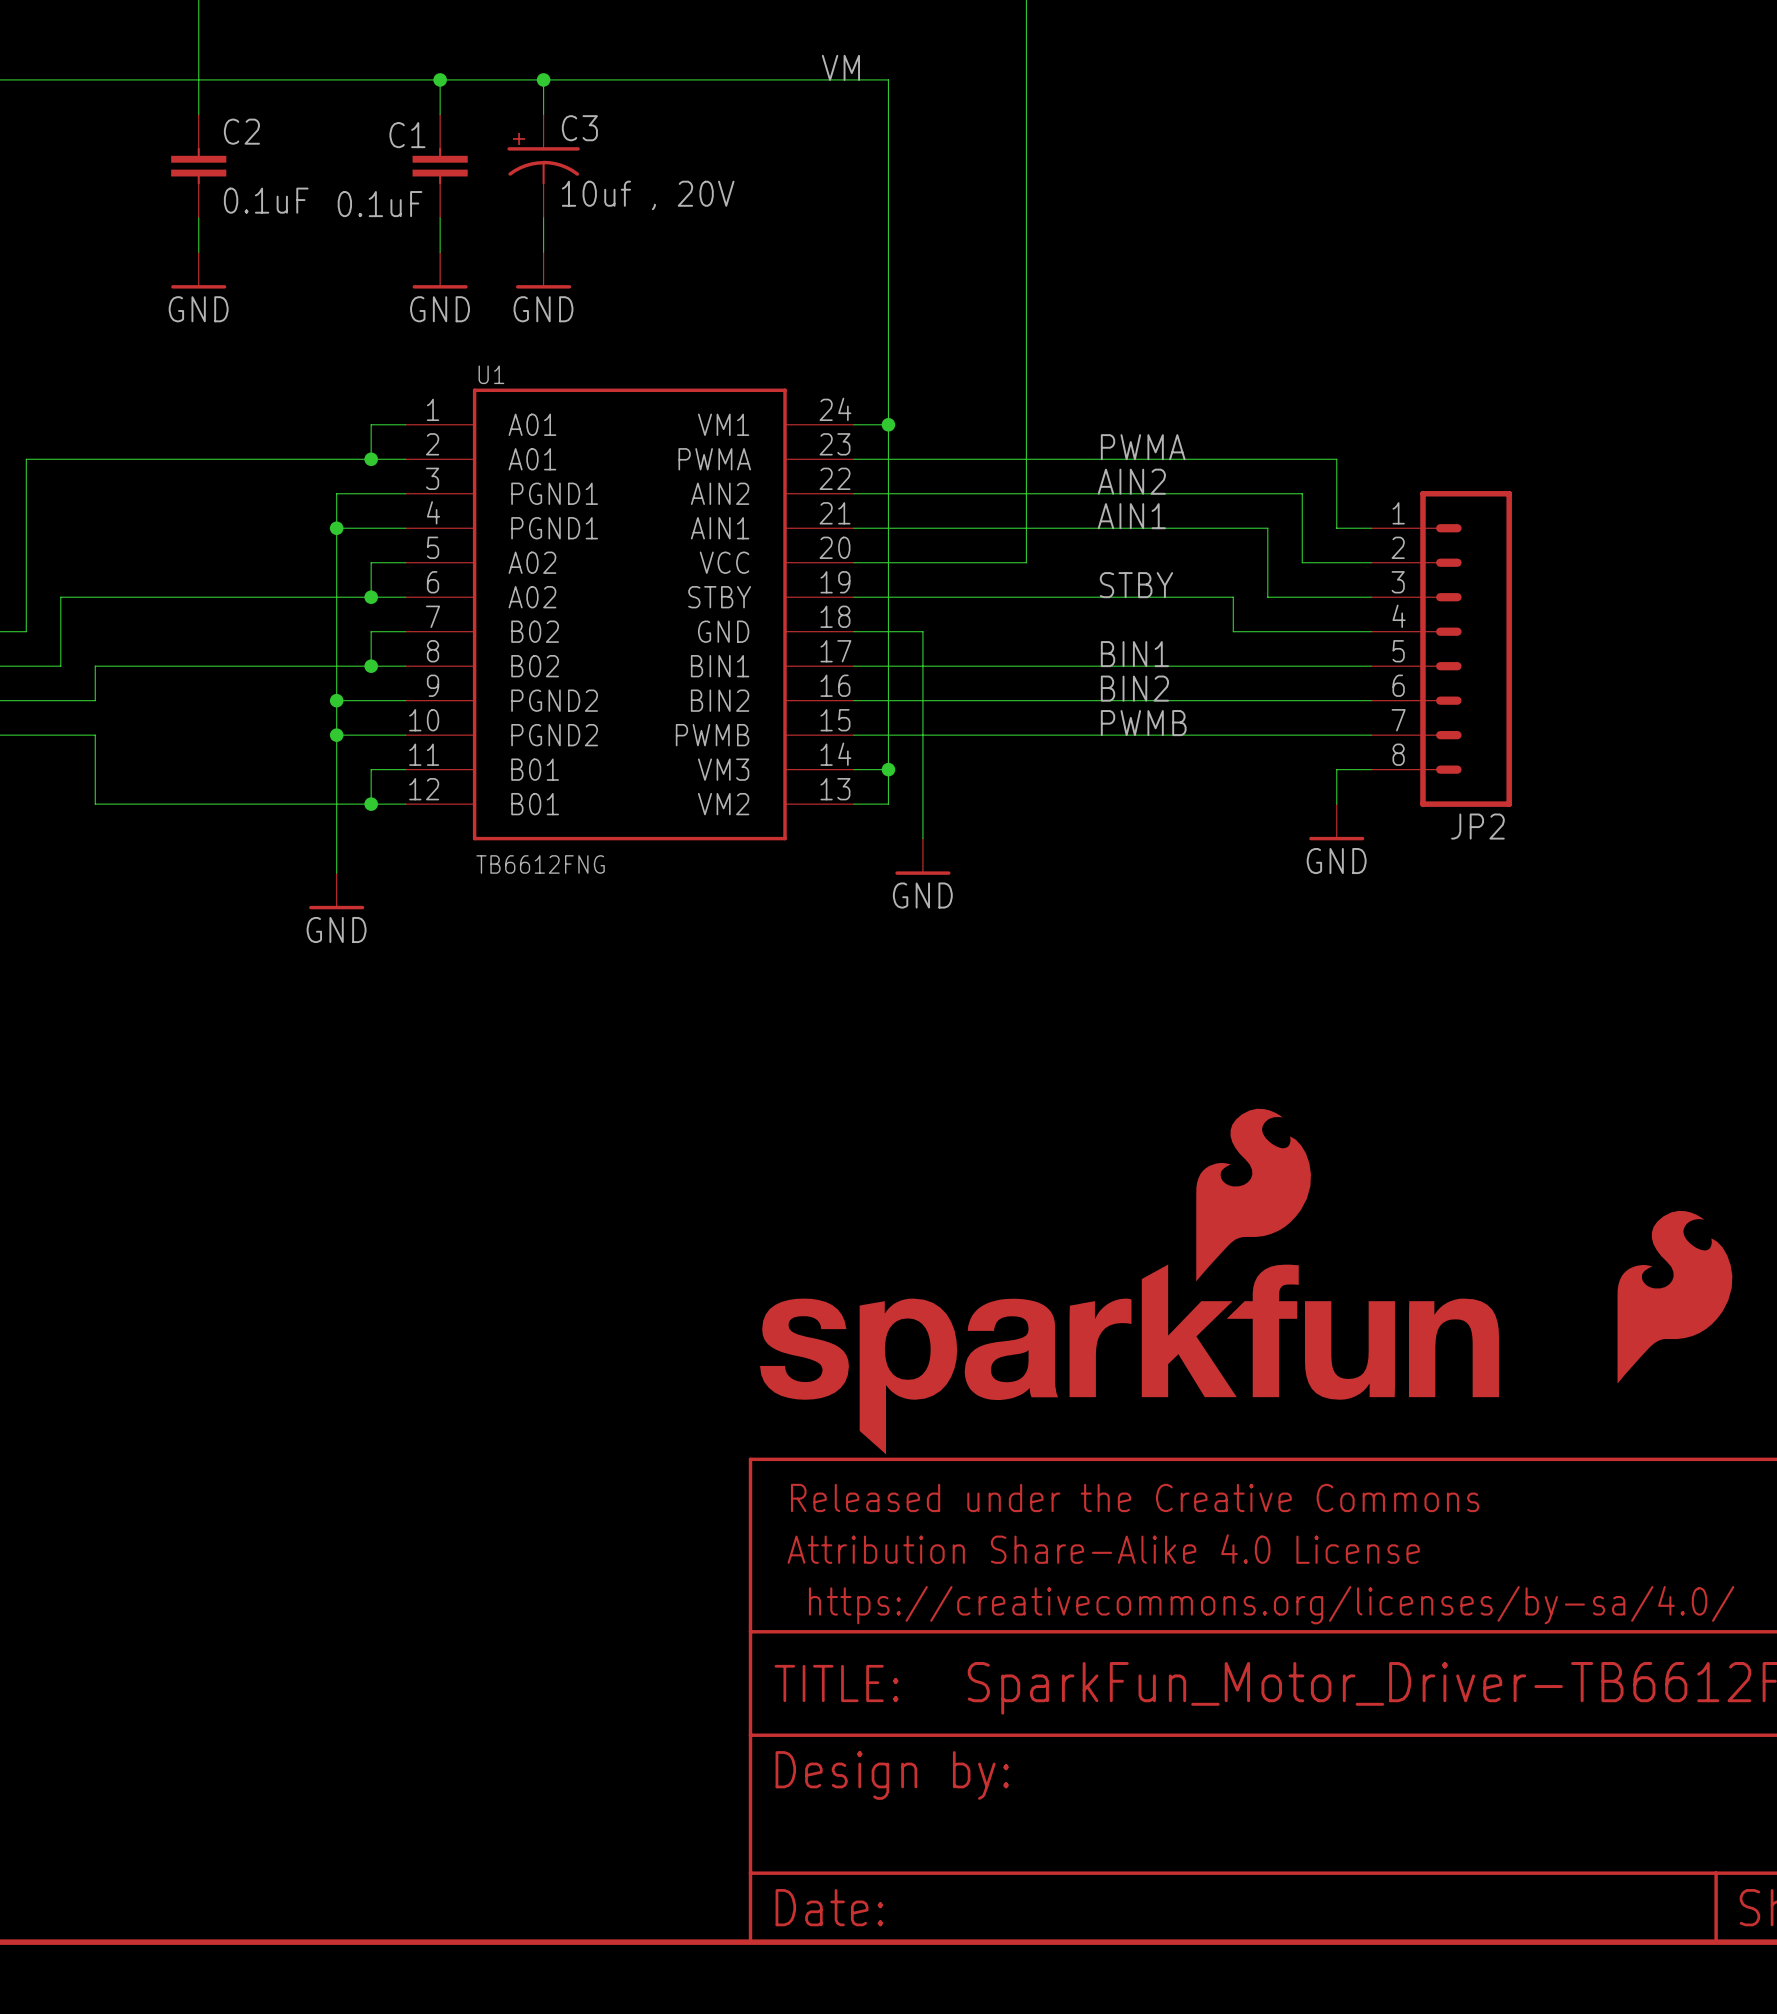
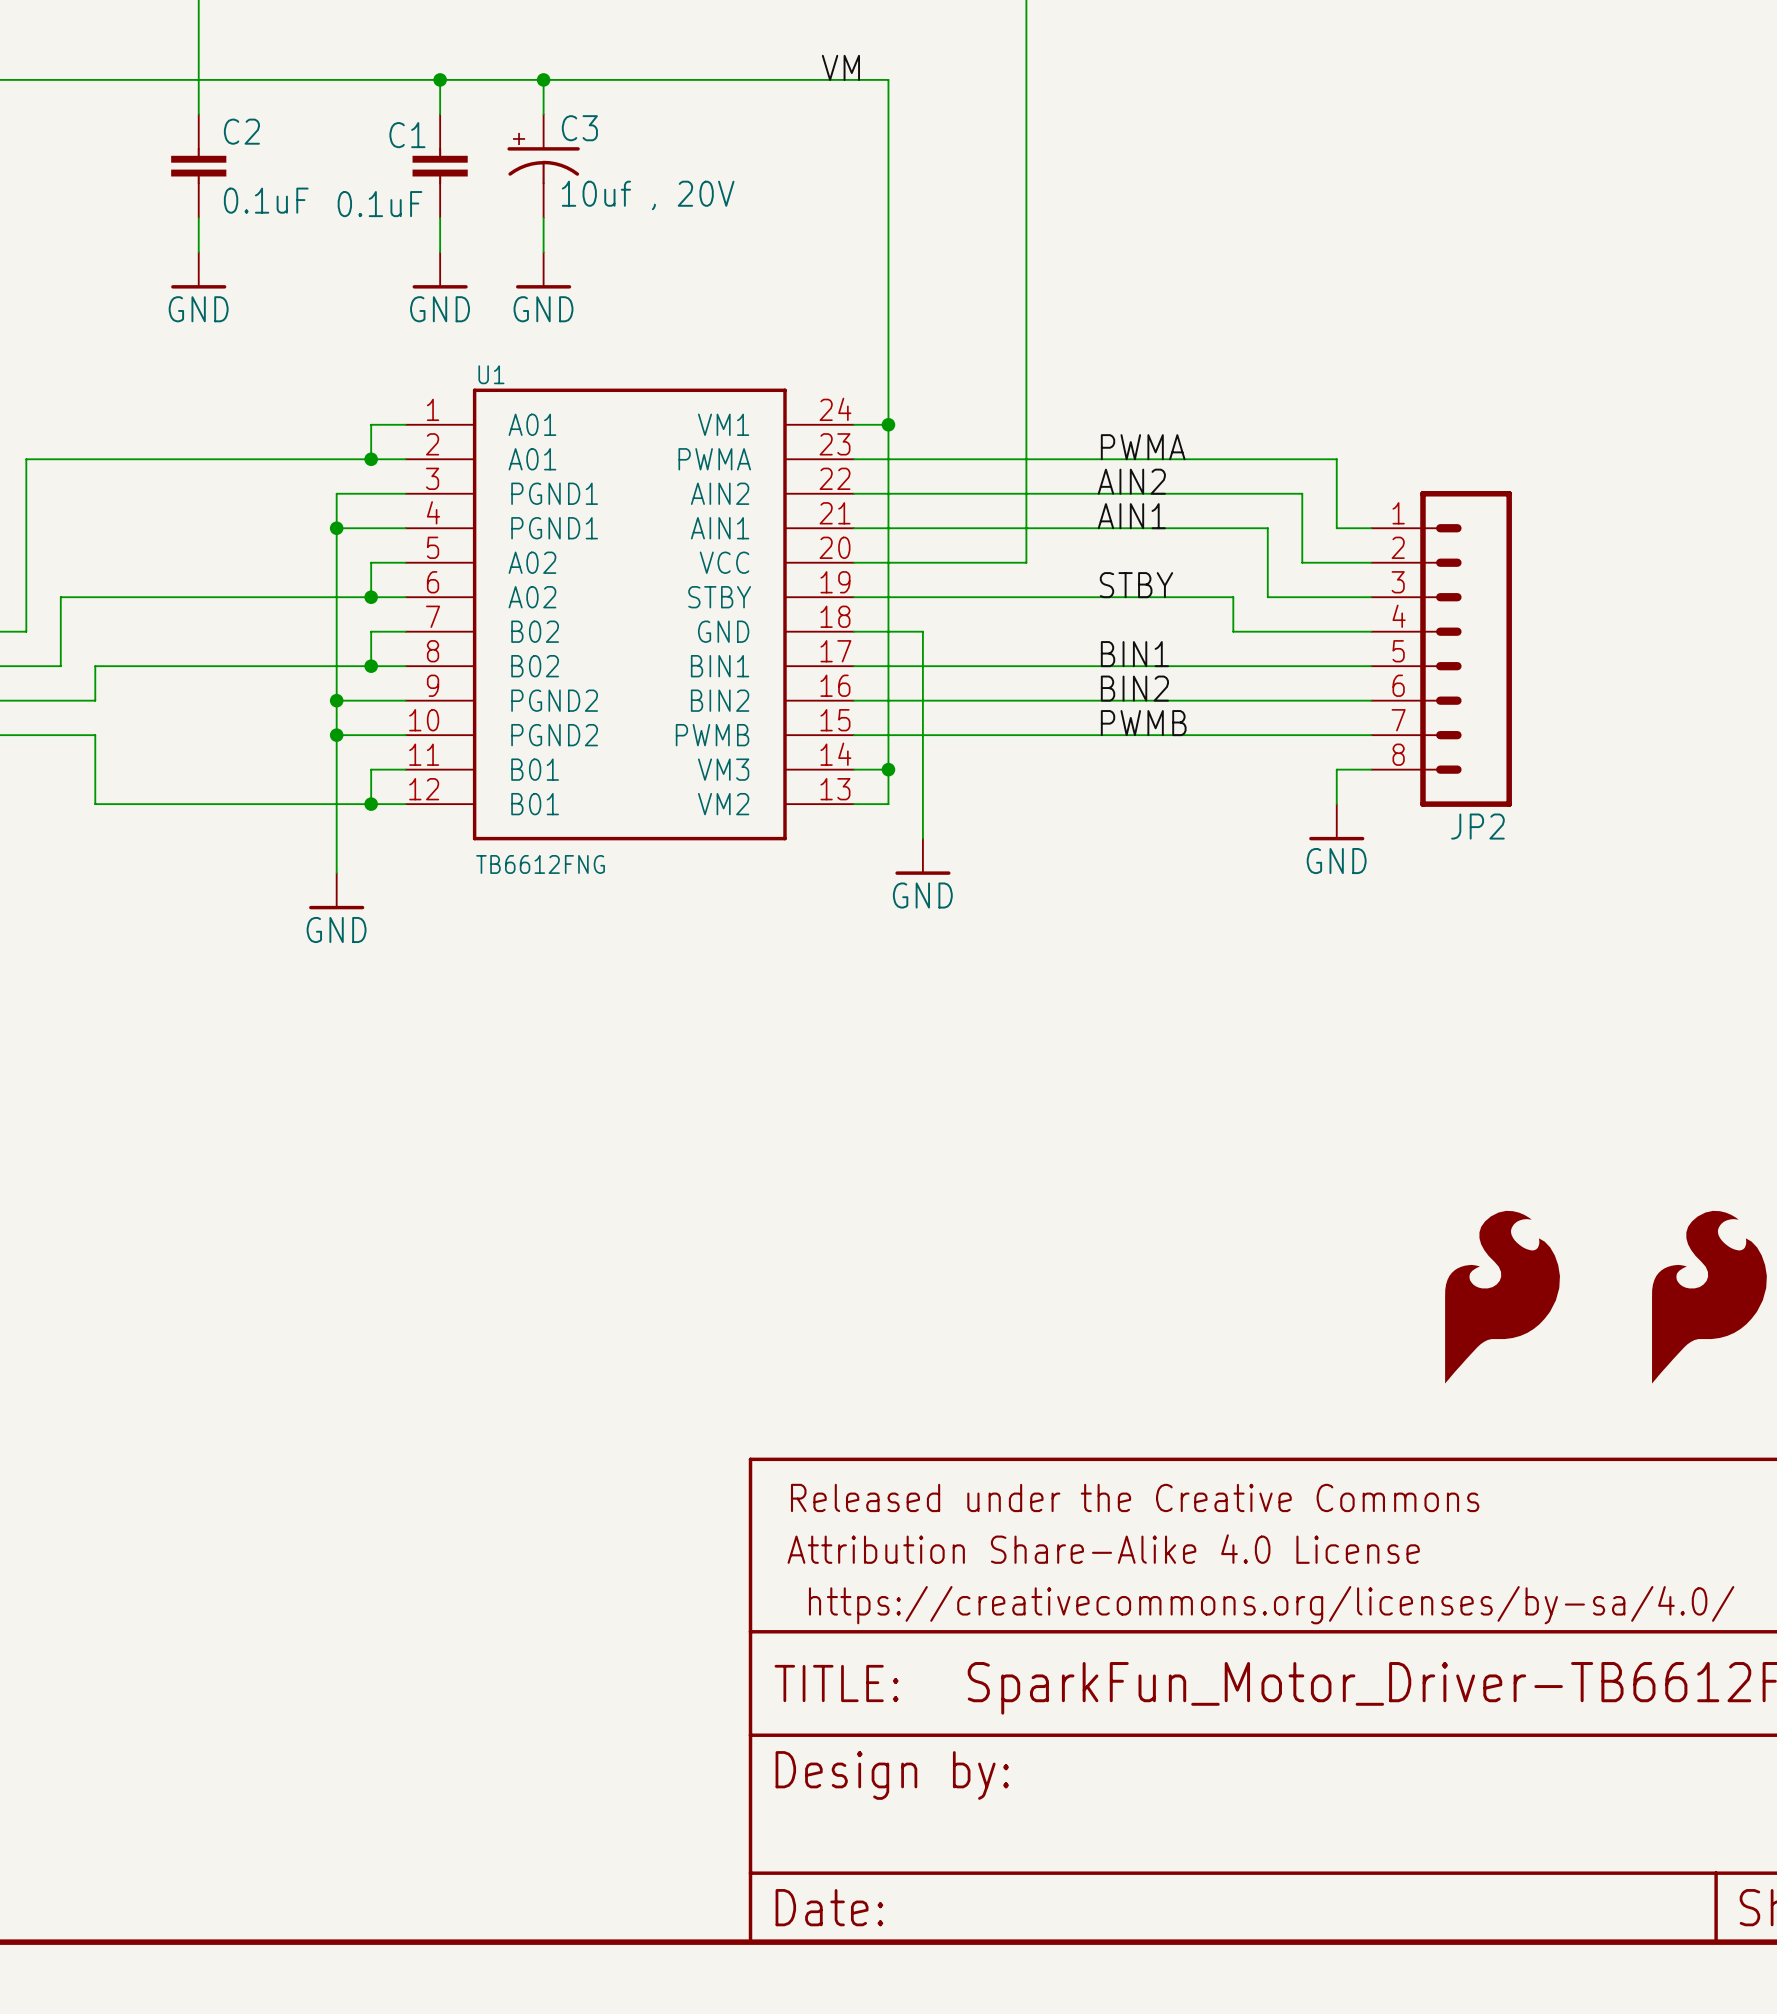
part: (1129, 1281) -> none
part: none -> (1502, 1297)
part position: (1674, 1297) -> (1709, 1297)

